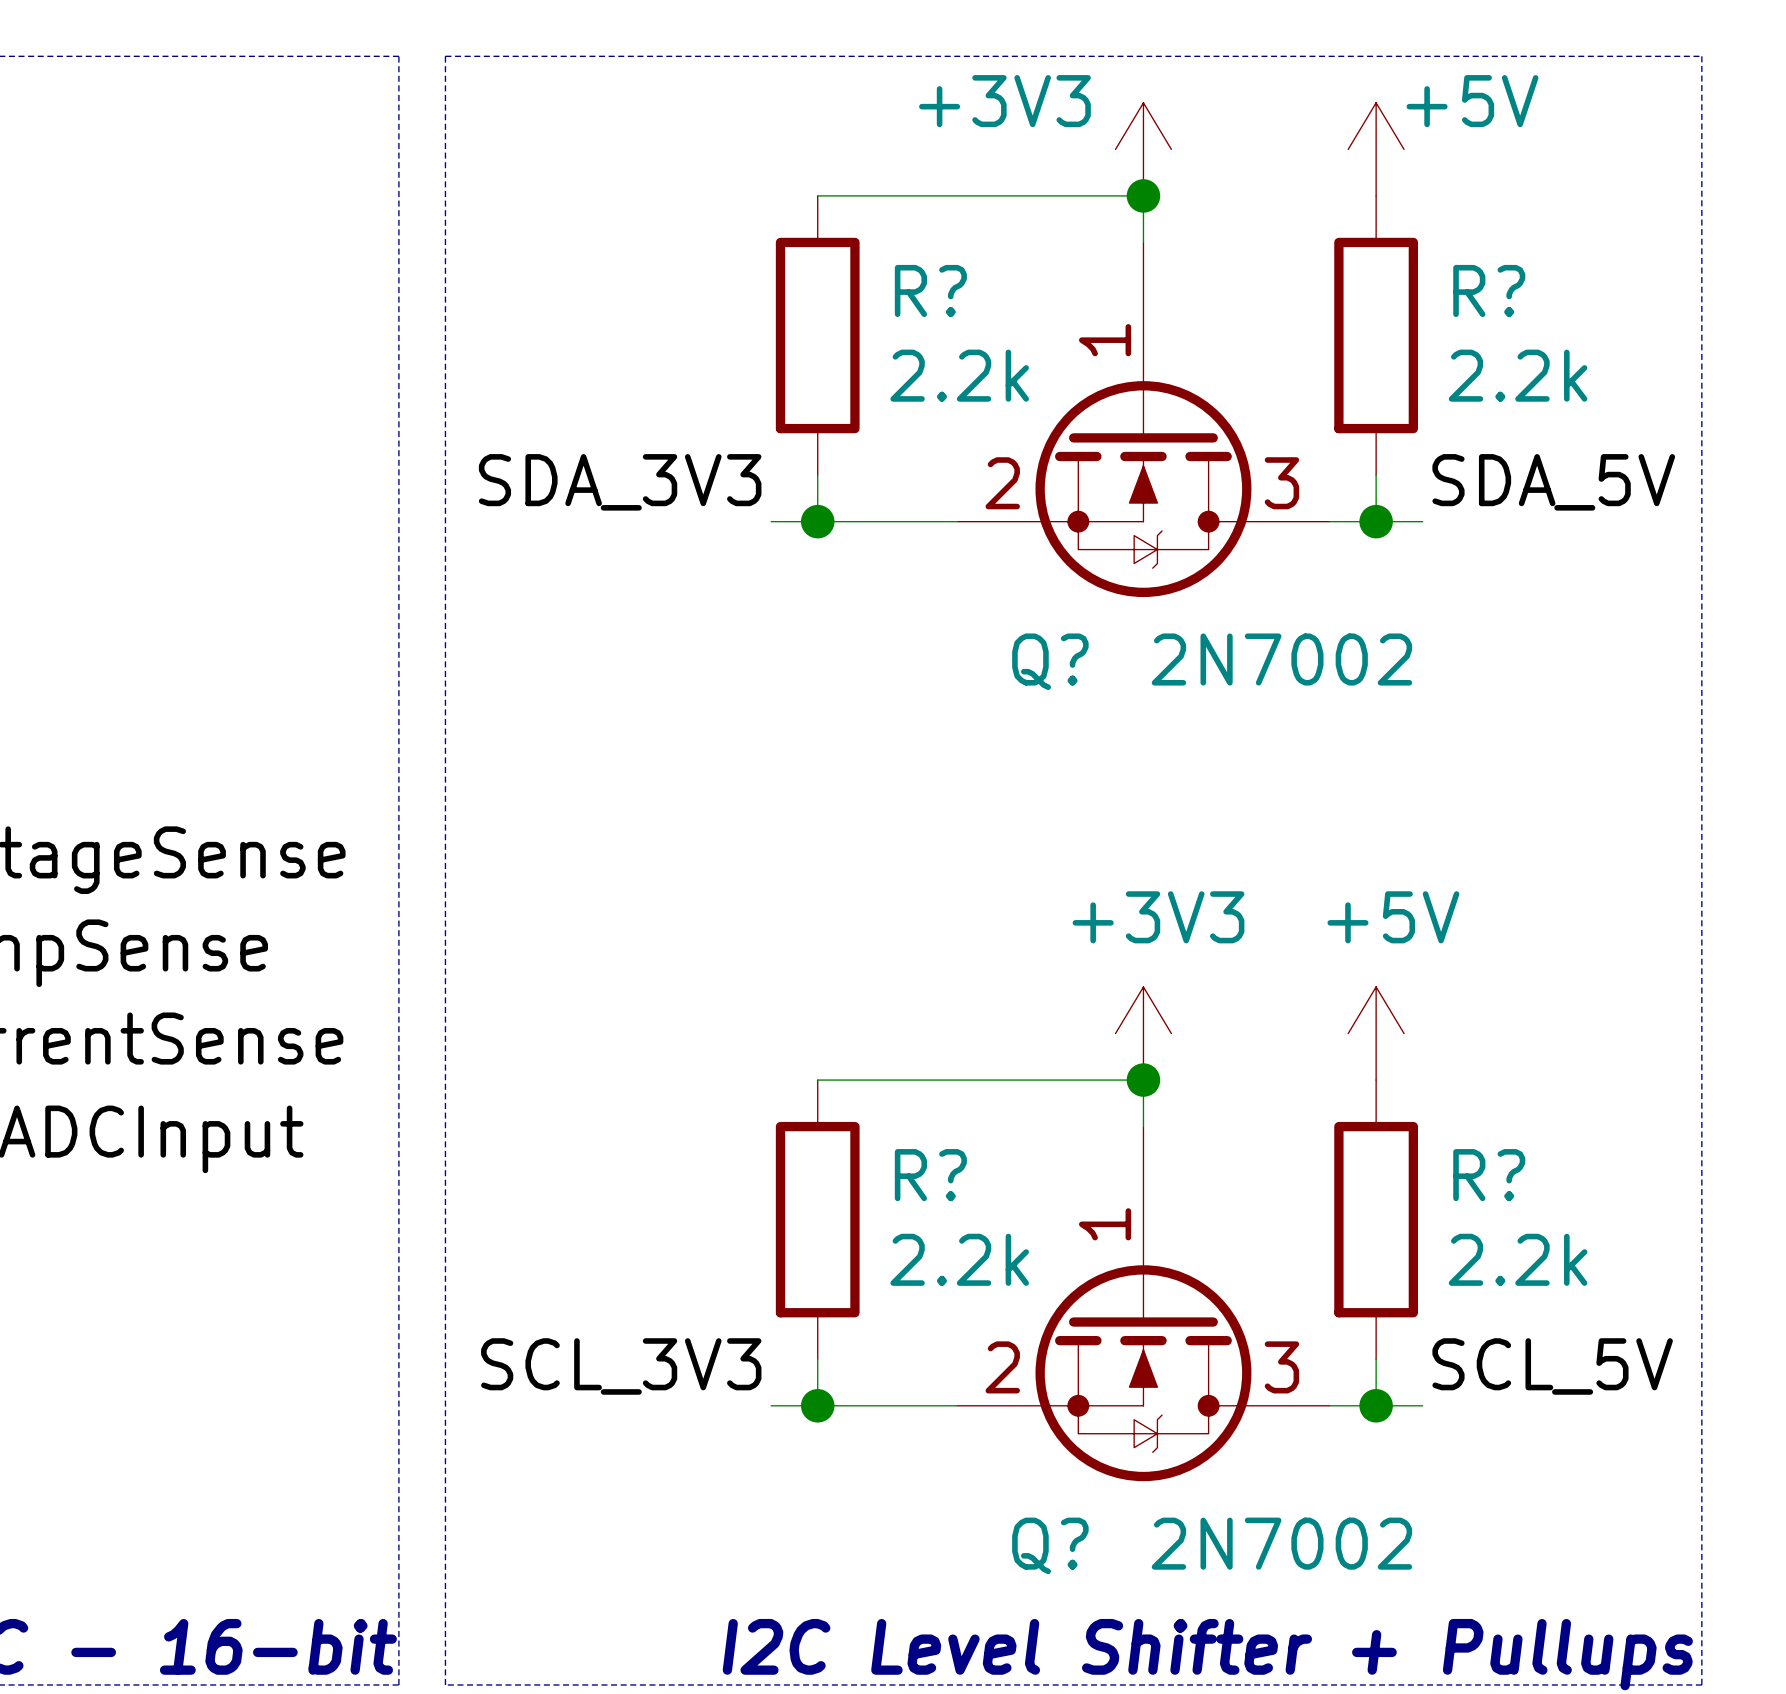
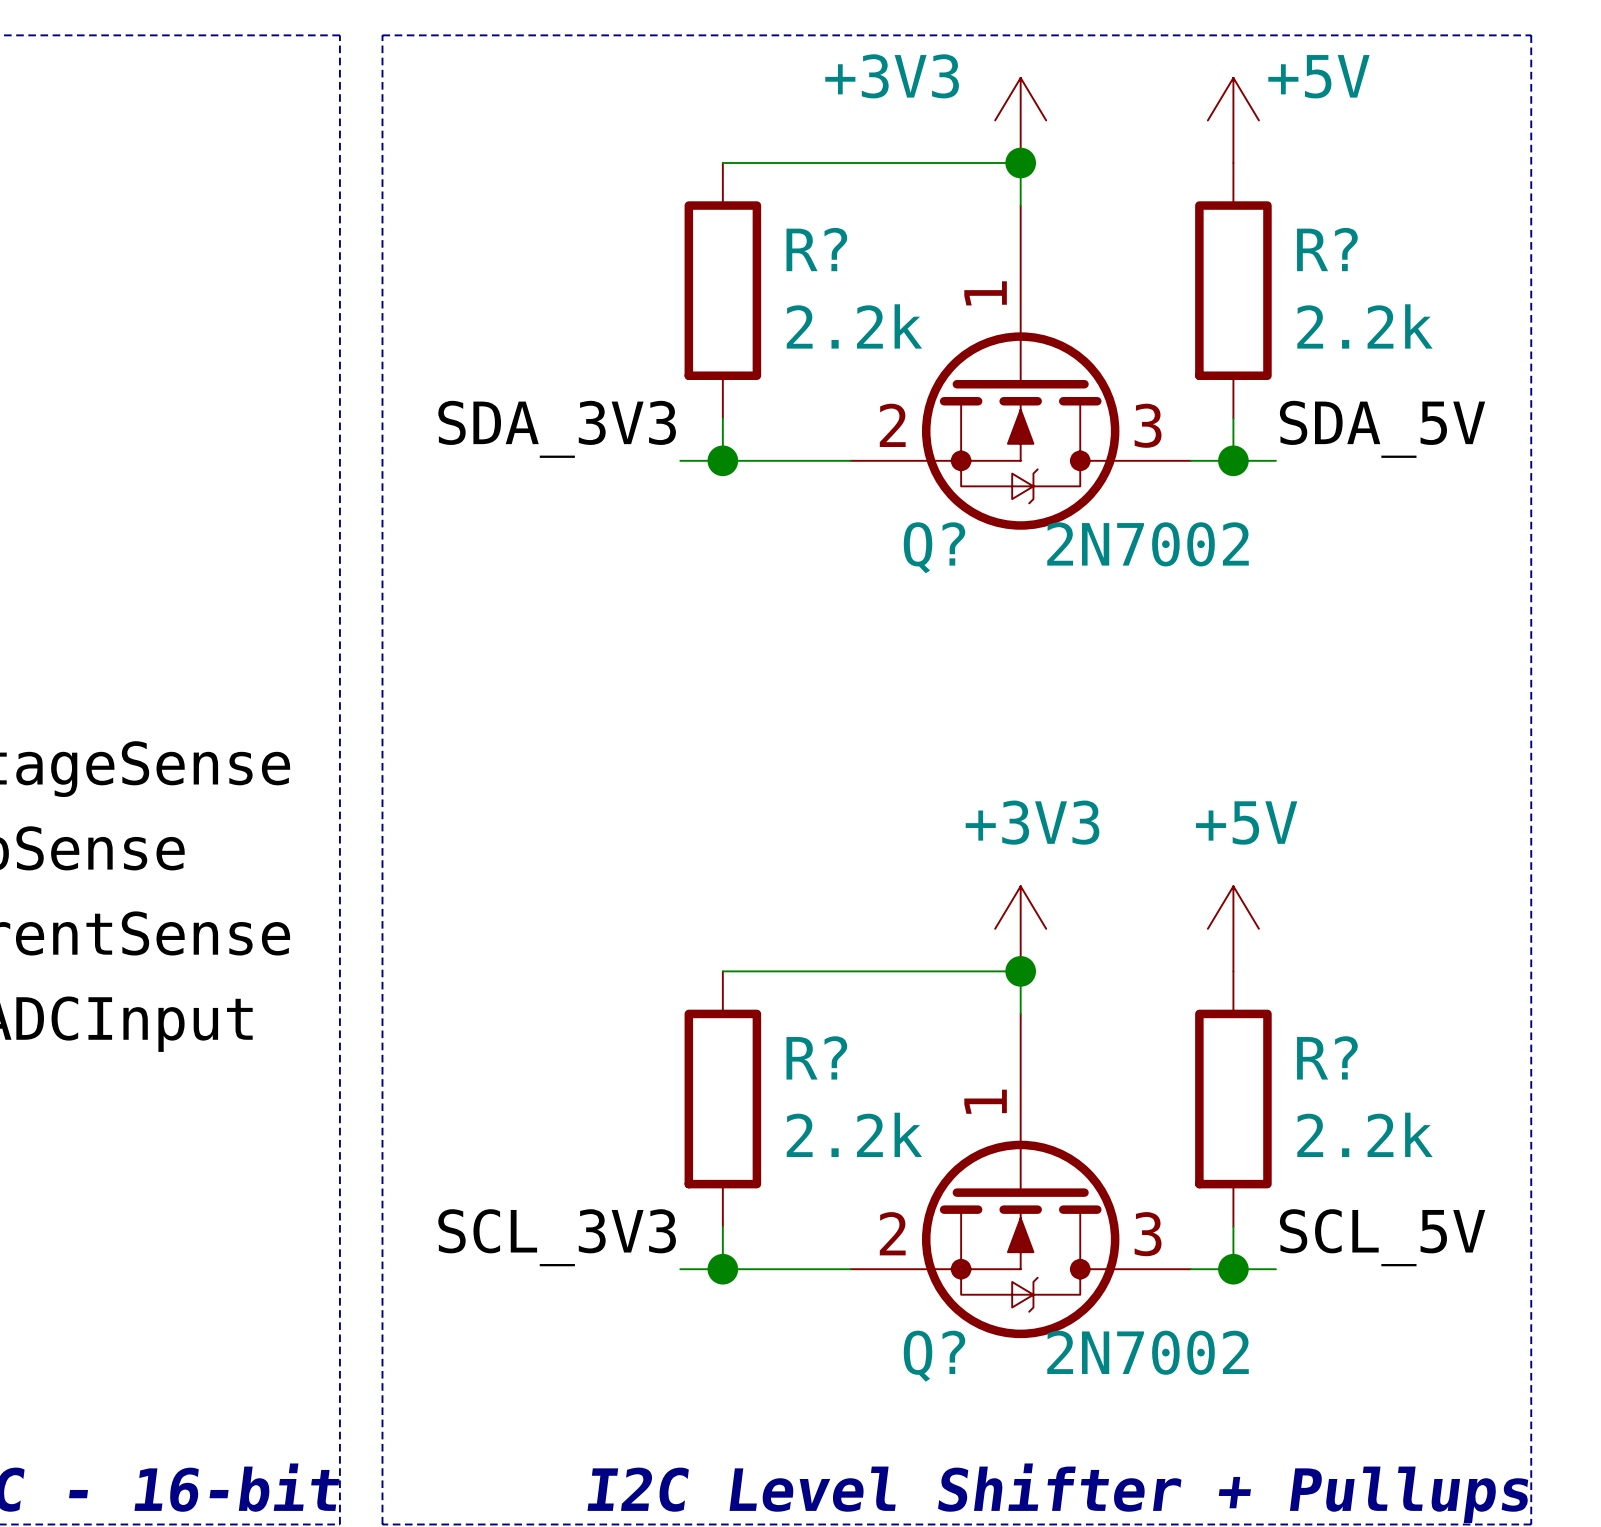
Q? value position: 2N7002 (1281, 659) -> 2N7002 (1148, 544)
Q? name position: Q? (1050, 661) -> Q? (934, 547)
Q? value position: 2N7002 (1281, 1543) -> 2N7002 (1148, 1352)
Q? name position: Q? (1050, 1545) -> Q? (934, 1356)

